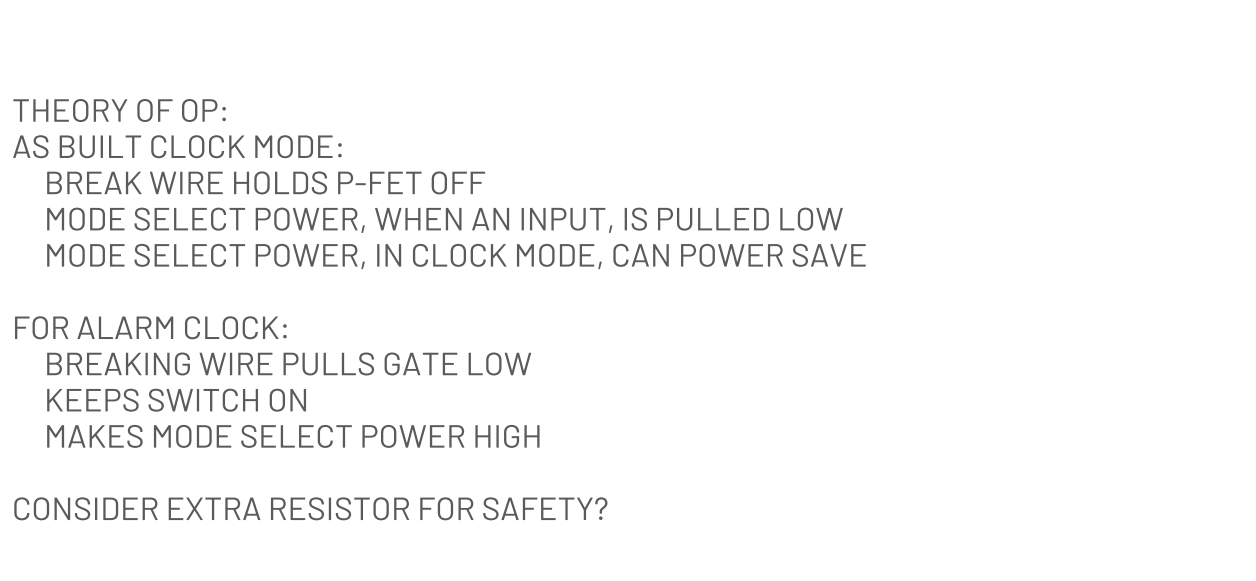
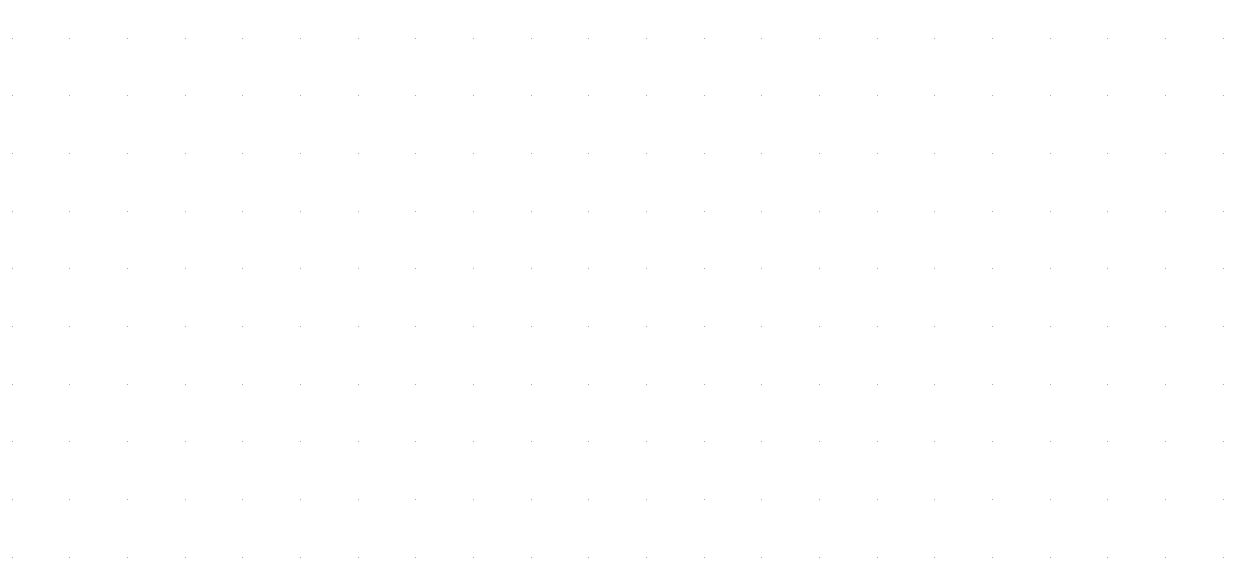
text: THEORY OF OP: (119, 110) -> none
text: AS BUILT CLOCK MODE: (177, 146) -> none
text: BREAK WIRE HOLDS P-FET OFF (266, 182) -> none
text: MODE SELECT POWER, WHEN AN INPUT, IS PULLED LOW (444, 220) -> none
text: MODE SELECT POWER, IN CLOCK MODE, CAN POWER SAVE (456, 256) -> none
text: FOR ALARM CLOCK: (150, 327) -> none
text: BREAKING WIRE PULLS GATE LOW (289, 363) -> none
text: KEEPS SWITCH ON (176, 400) -> none
text: MAKES MODE SELECT POWER HIGH (293, 436) -> none
text: CONSIDER EXTRA RESISTOR FOR SAFETY? (310, 508) -> none

